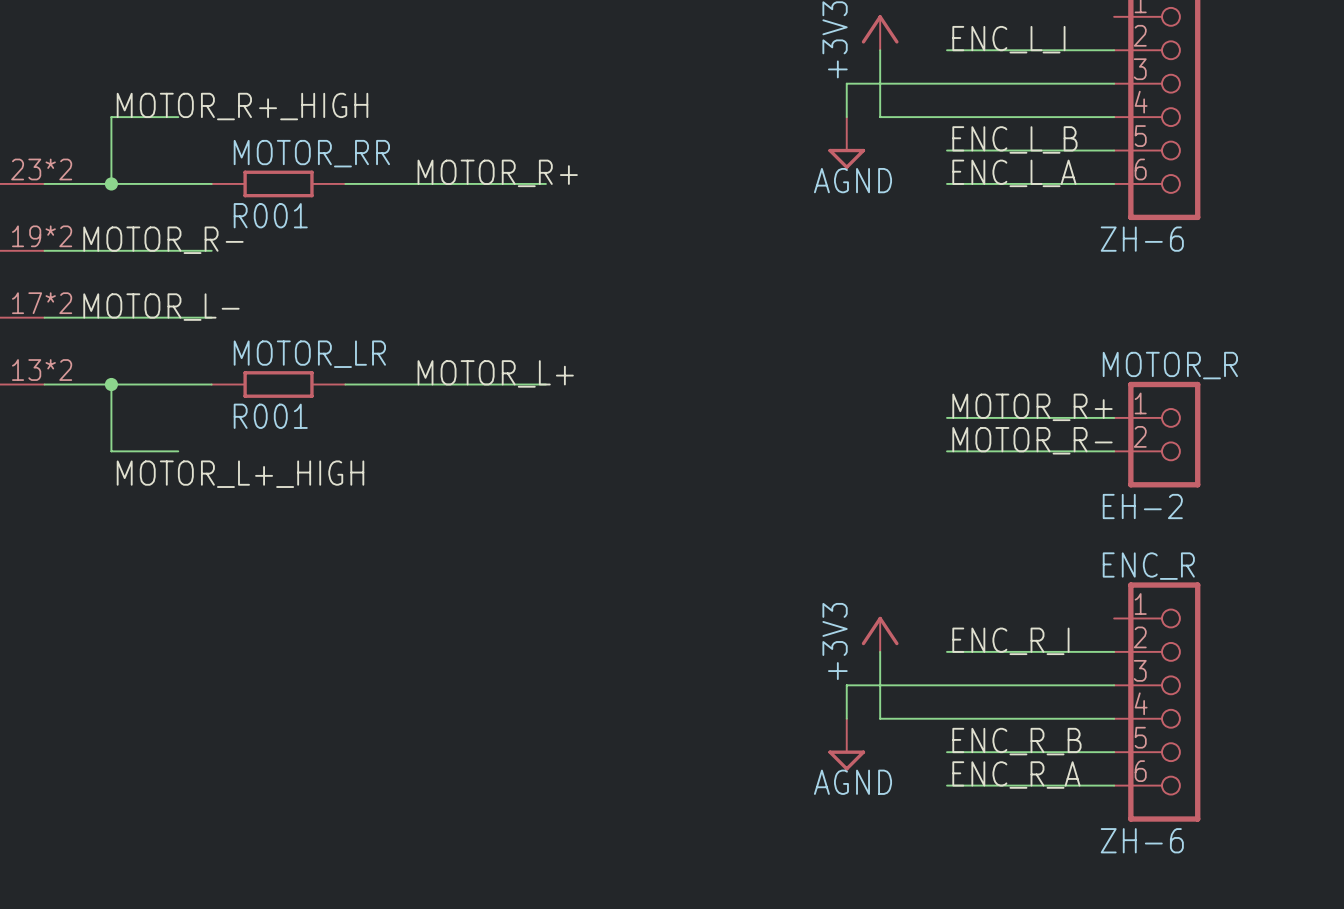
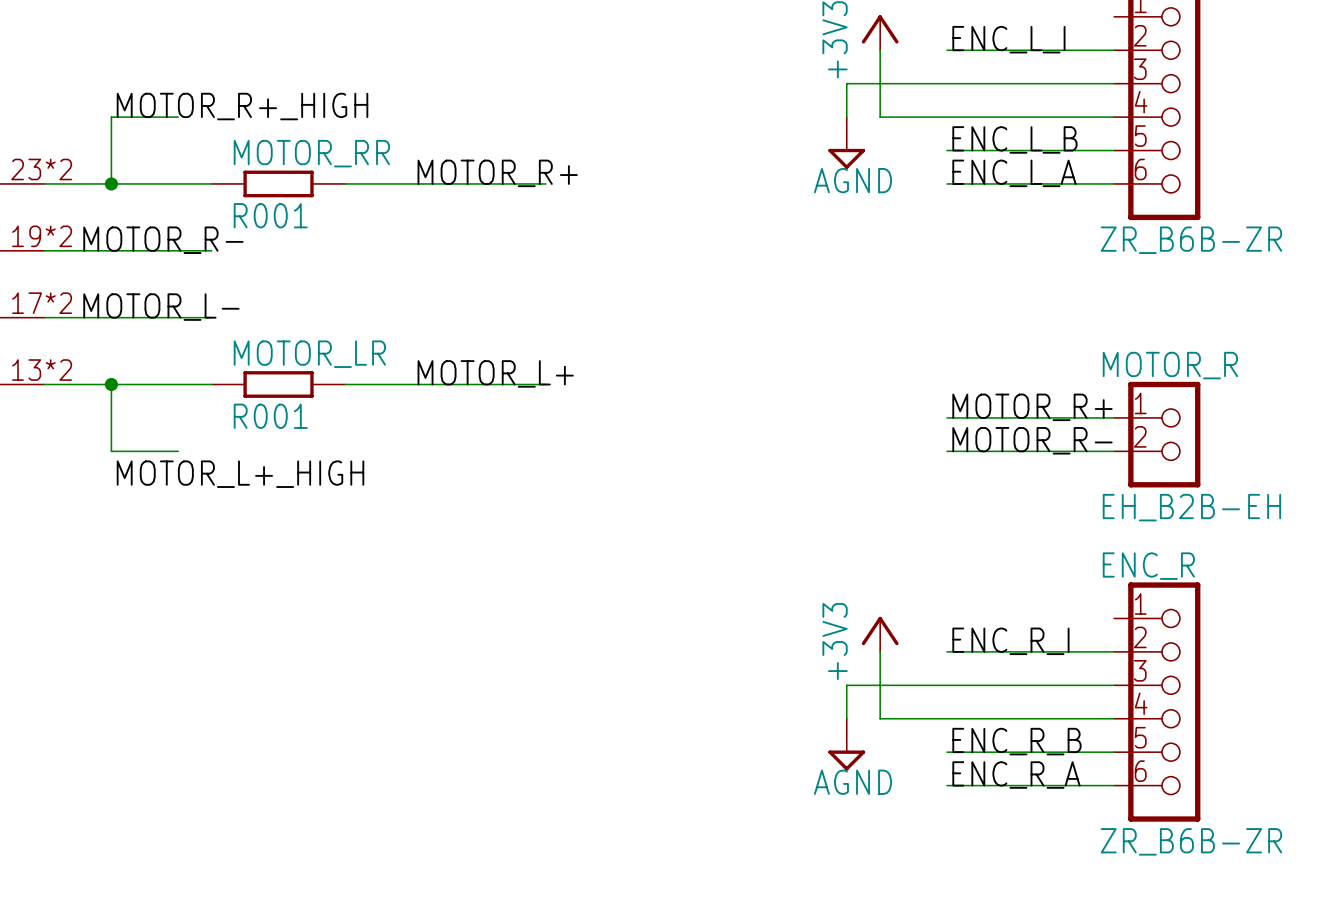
part value: ZH-6 (1142, 239) -> ZR_B6B-ZR (1191, 240)
MOTOR_R value: EH-2 (1142, 506) -> EH_B2B-EH (1191, 507)
ENC_R value: ZH-6 (1142, 840) -> ZR_B6B-ZR (1191, 841)

